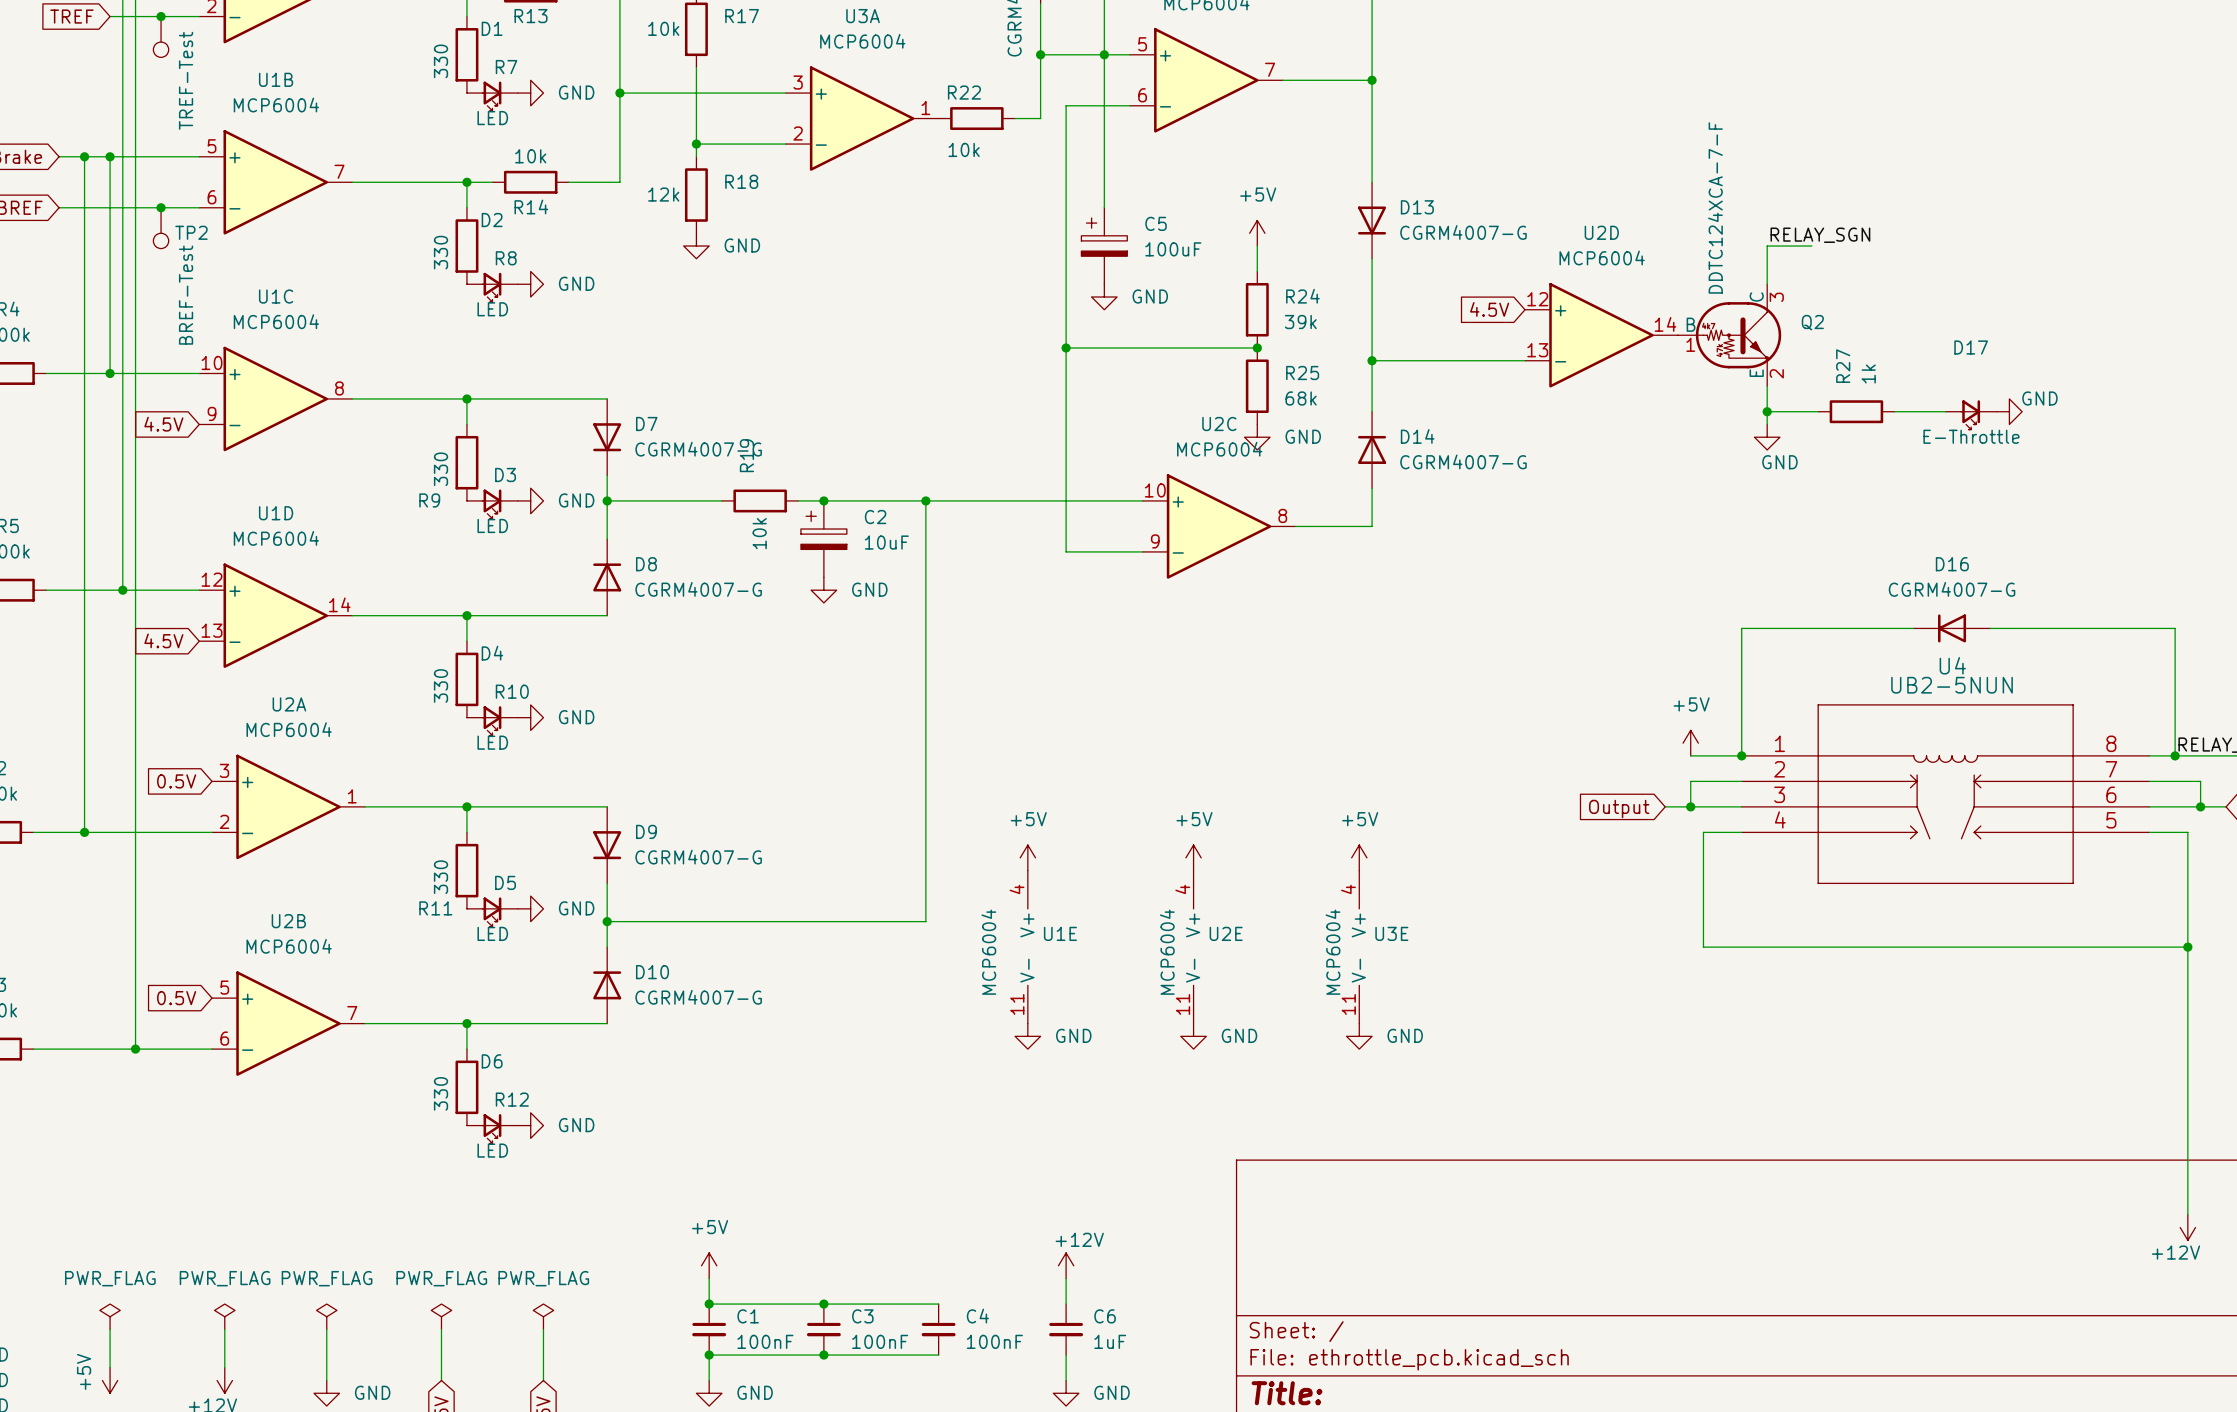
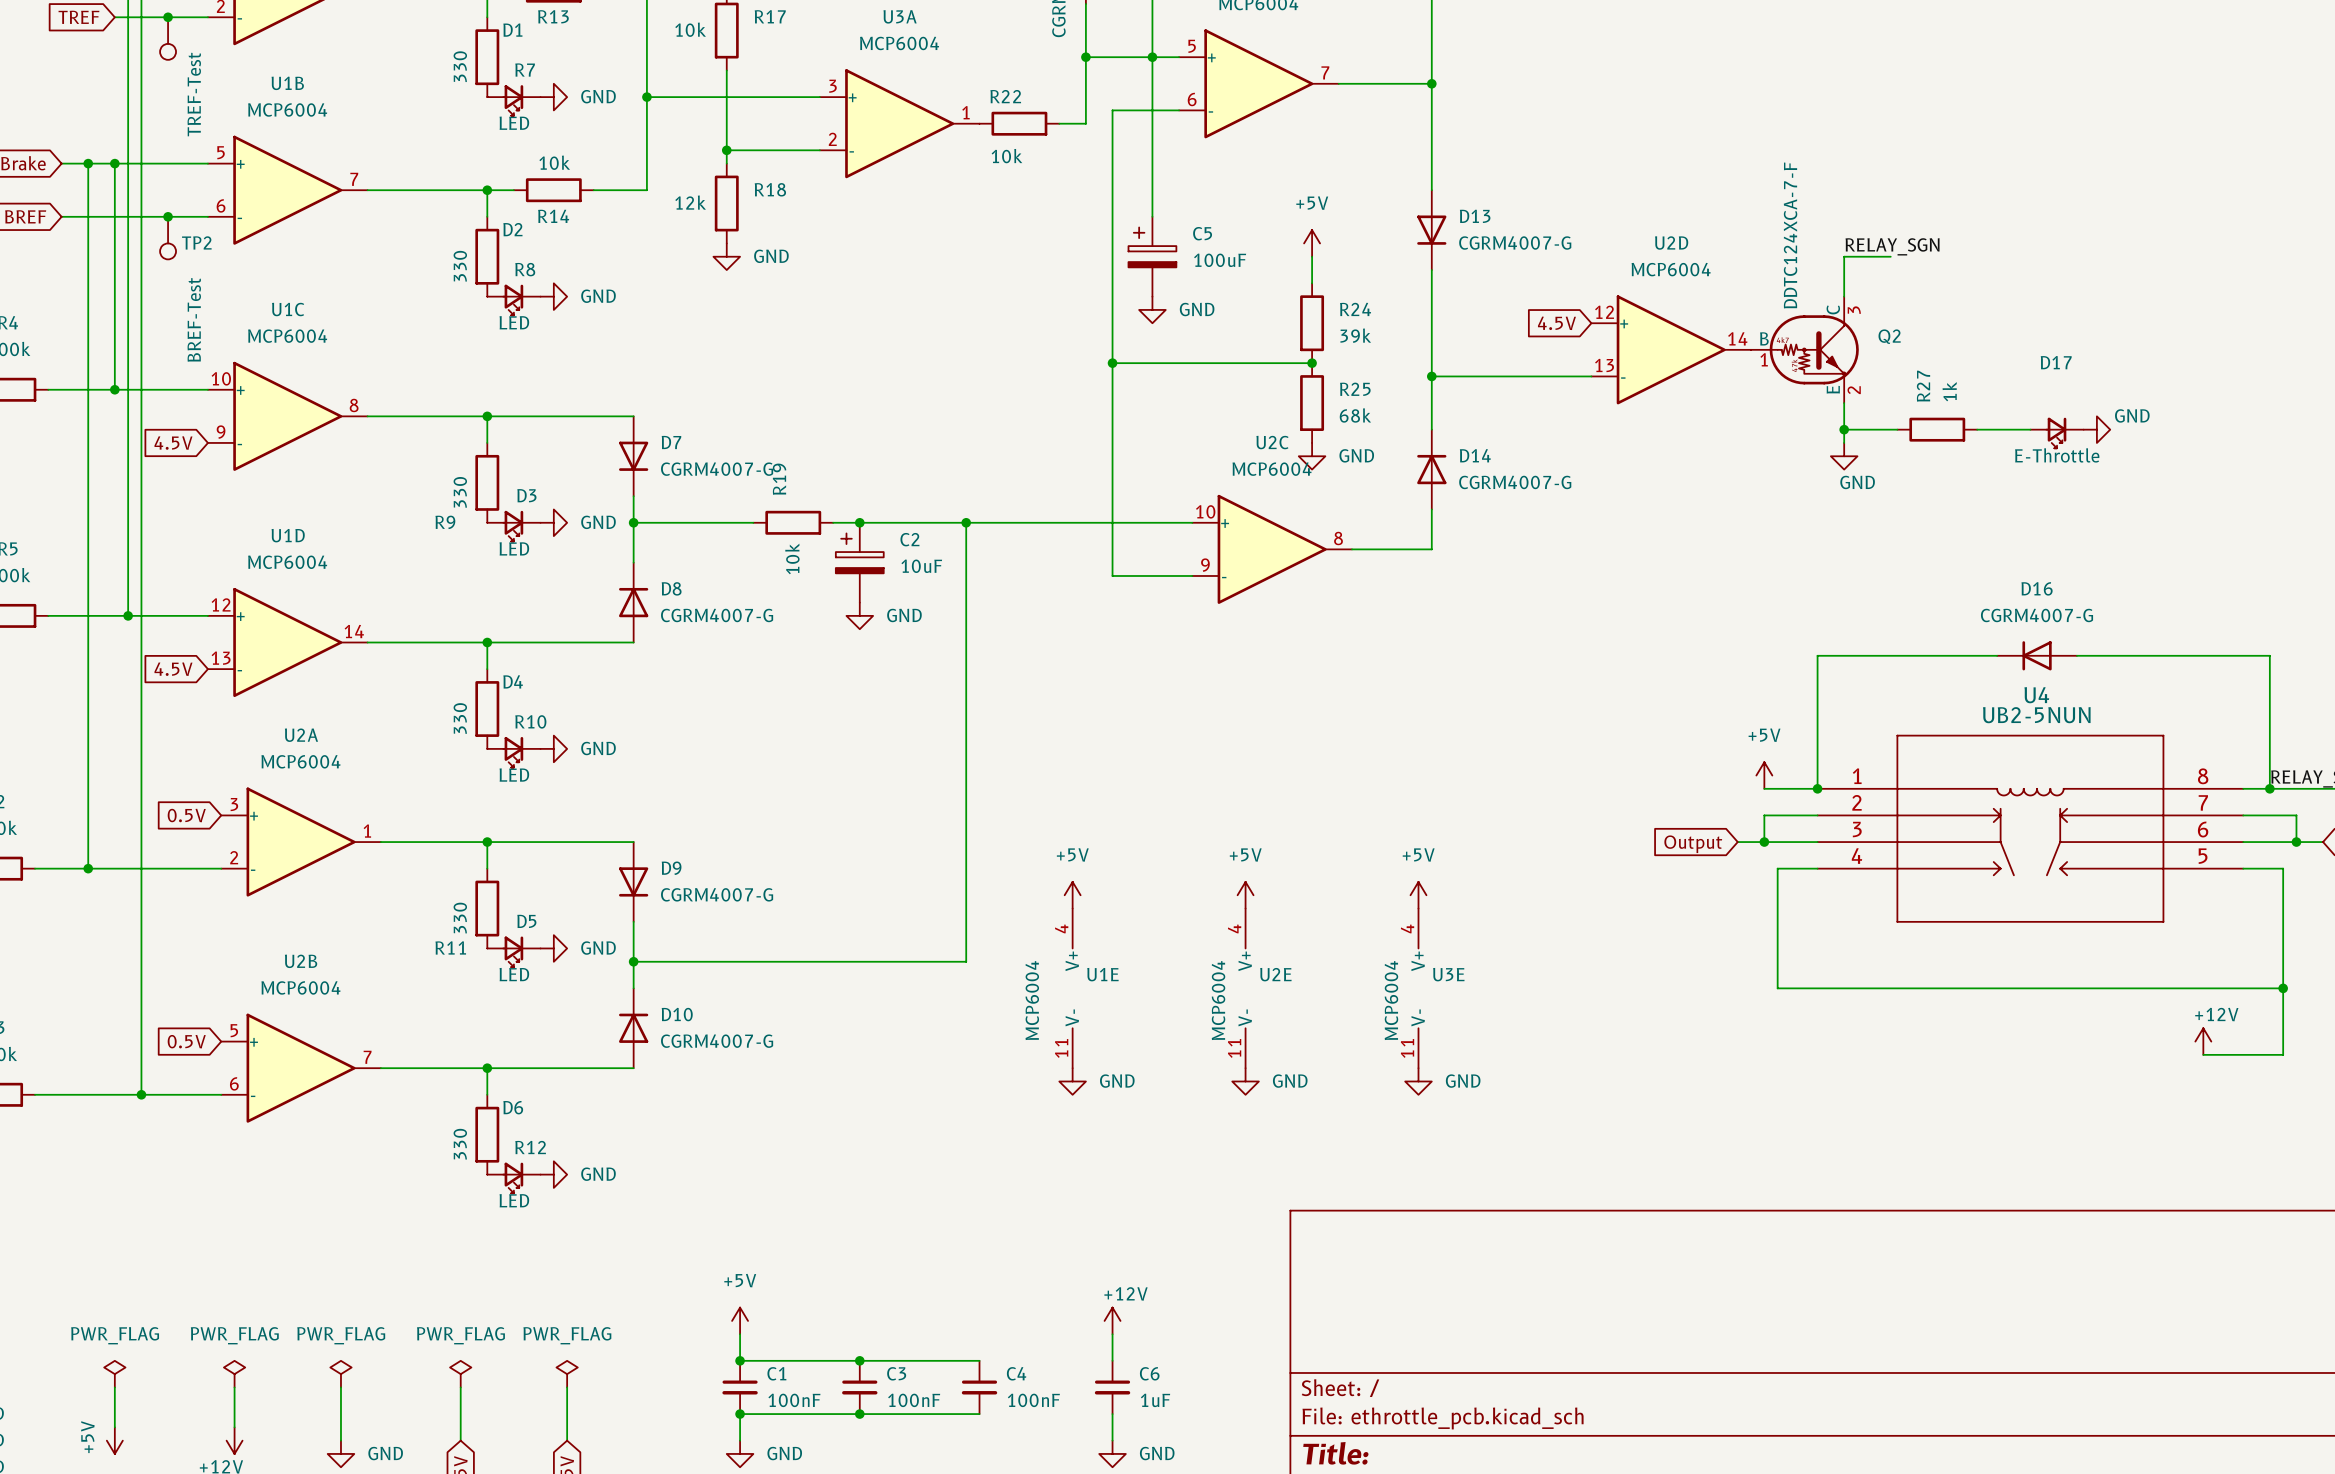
wire: (2187, 1010) (2187, 1214) -> (2283, 1054) (2203, 1054)
power symbol rotation: 0° (2187, 1227) -> 180° (2203, 1041)
power symbol position: +12V (2187, 1227) -> +12V (2203, 1041)

